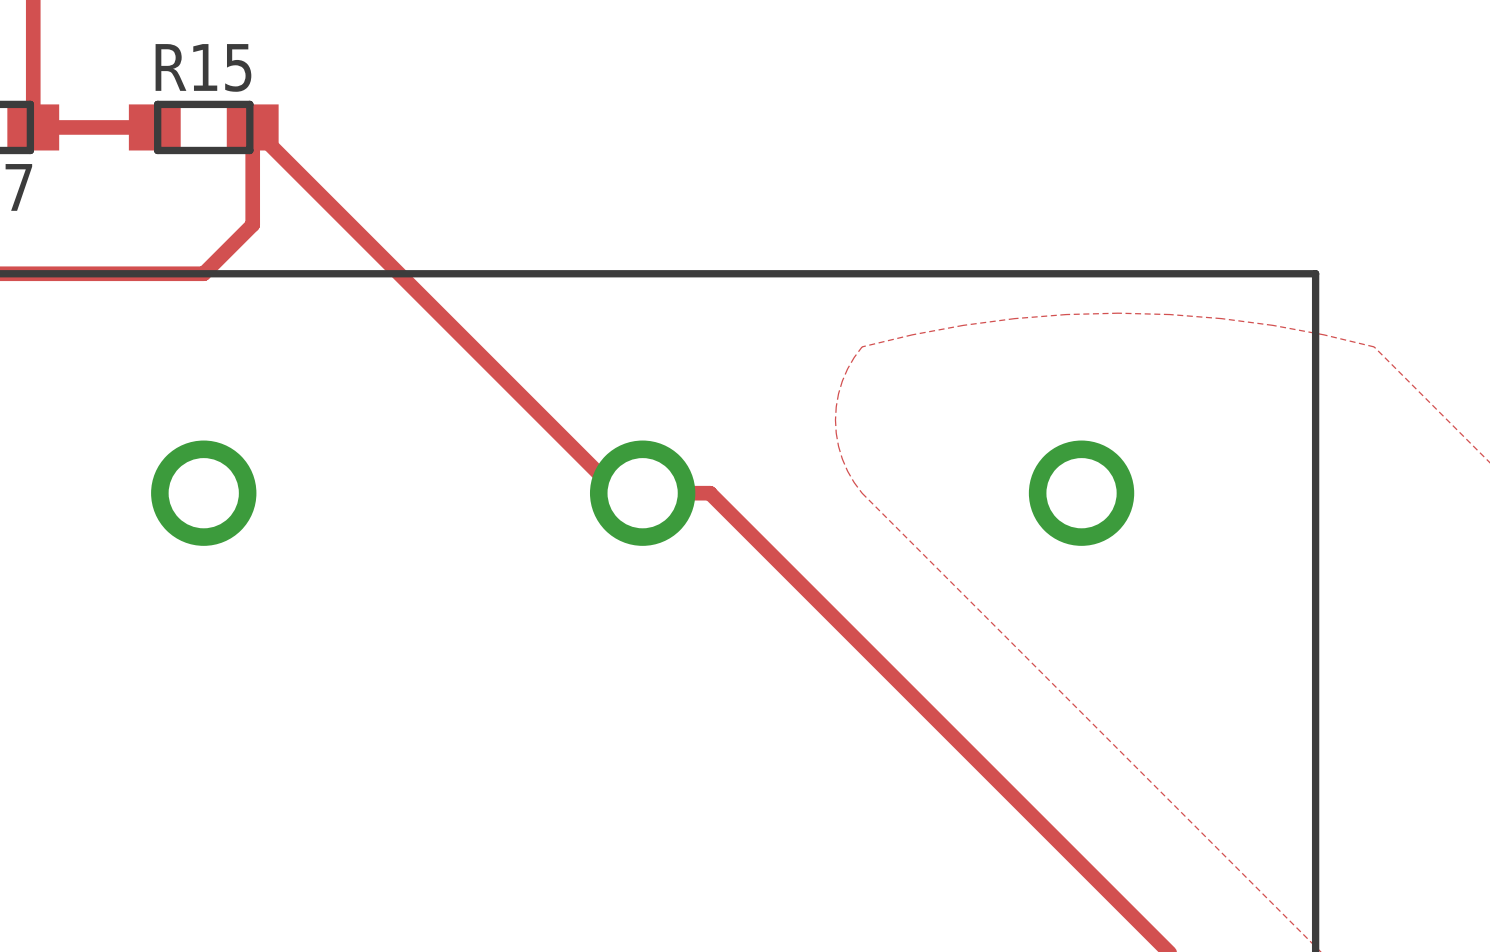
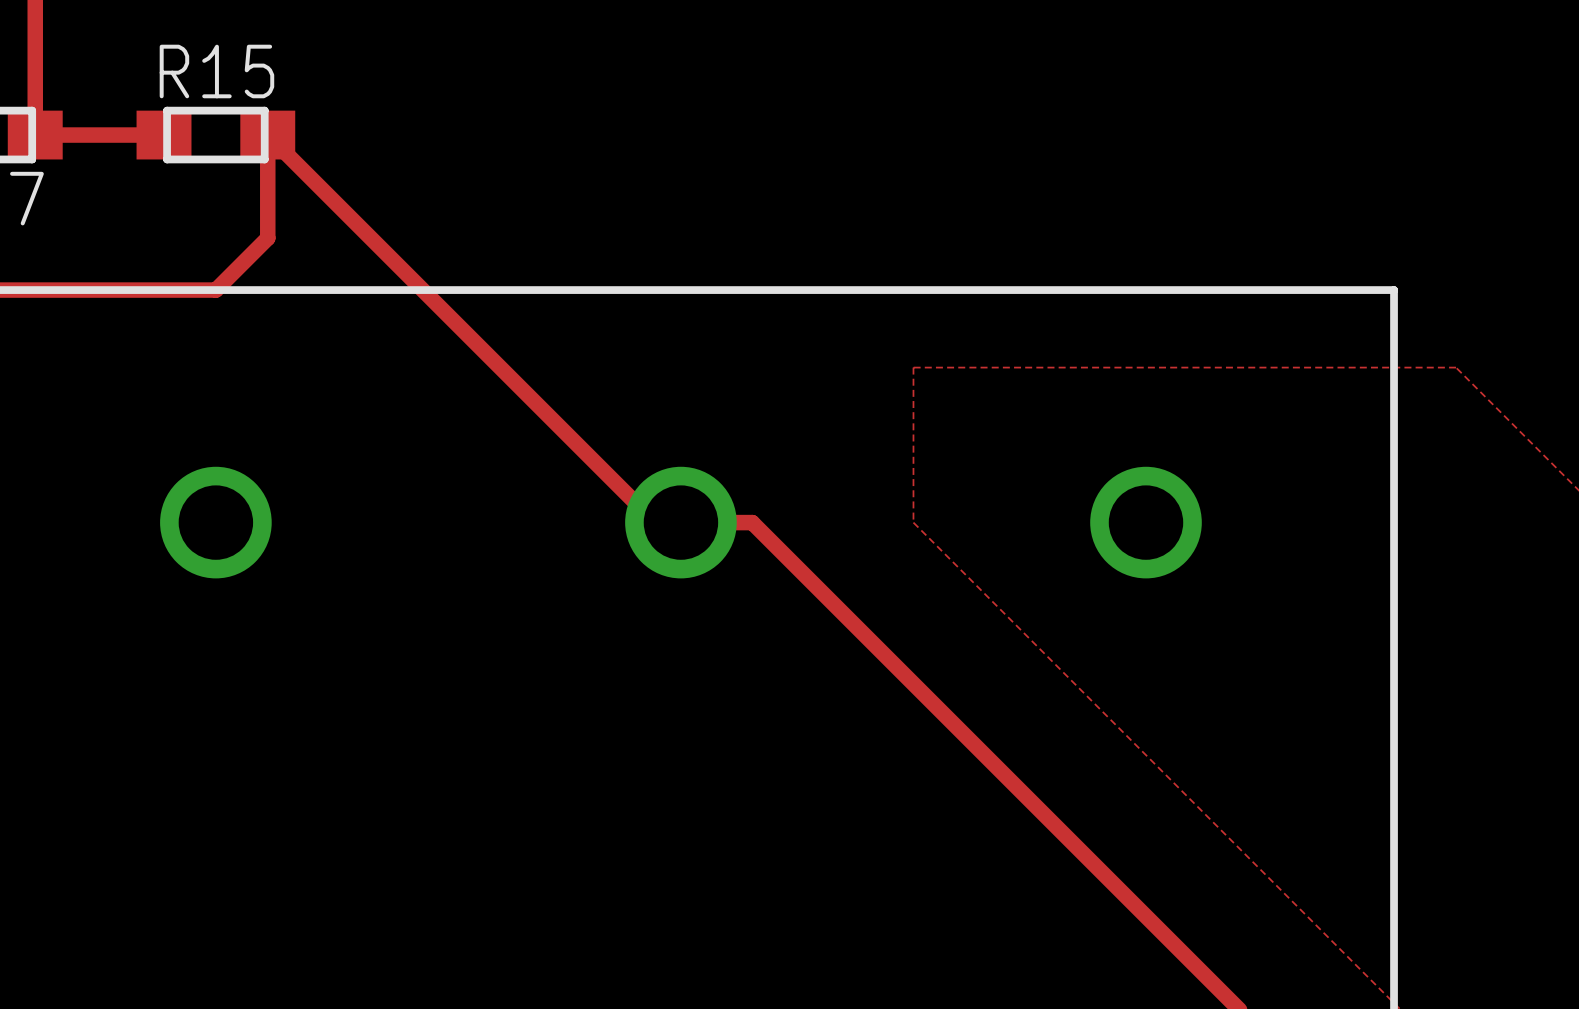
zone outline: (1374, 346) (1272, 325) (1169, 314) (1118, 313) (1066, 314) (963, 325) (862, 346) (854, 357) (842, 381) (836, 406) (835, 420) (836, 433) (842, 458) (854, 482) (862, 493) -> (1456, 367) (913, 367) (913, 522)

